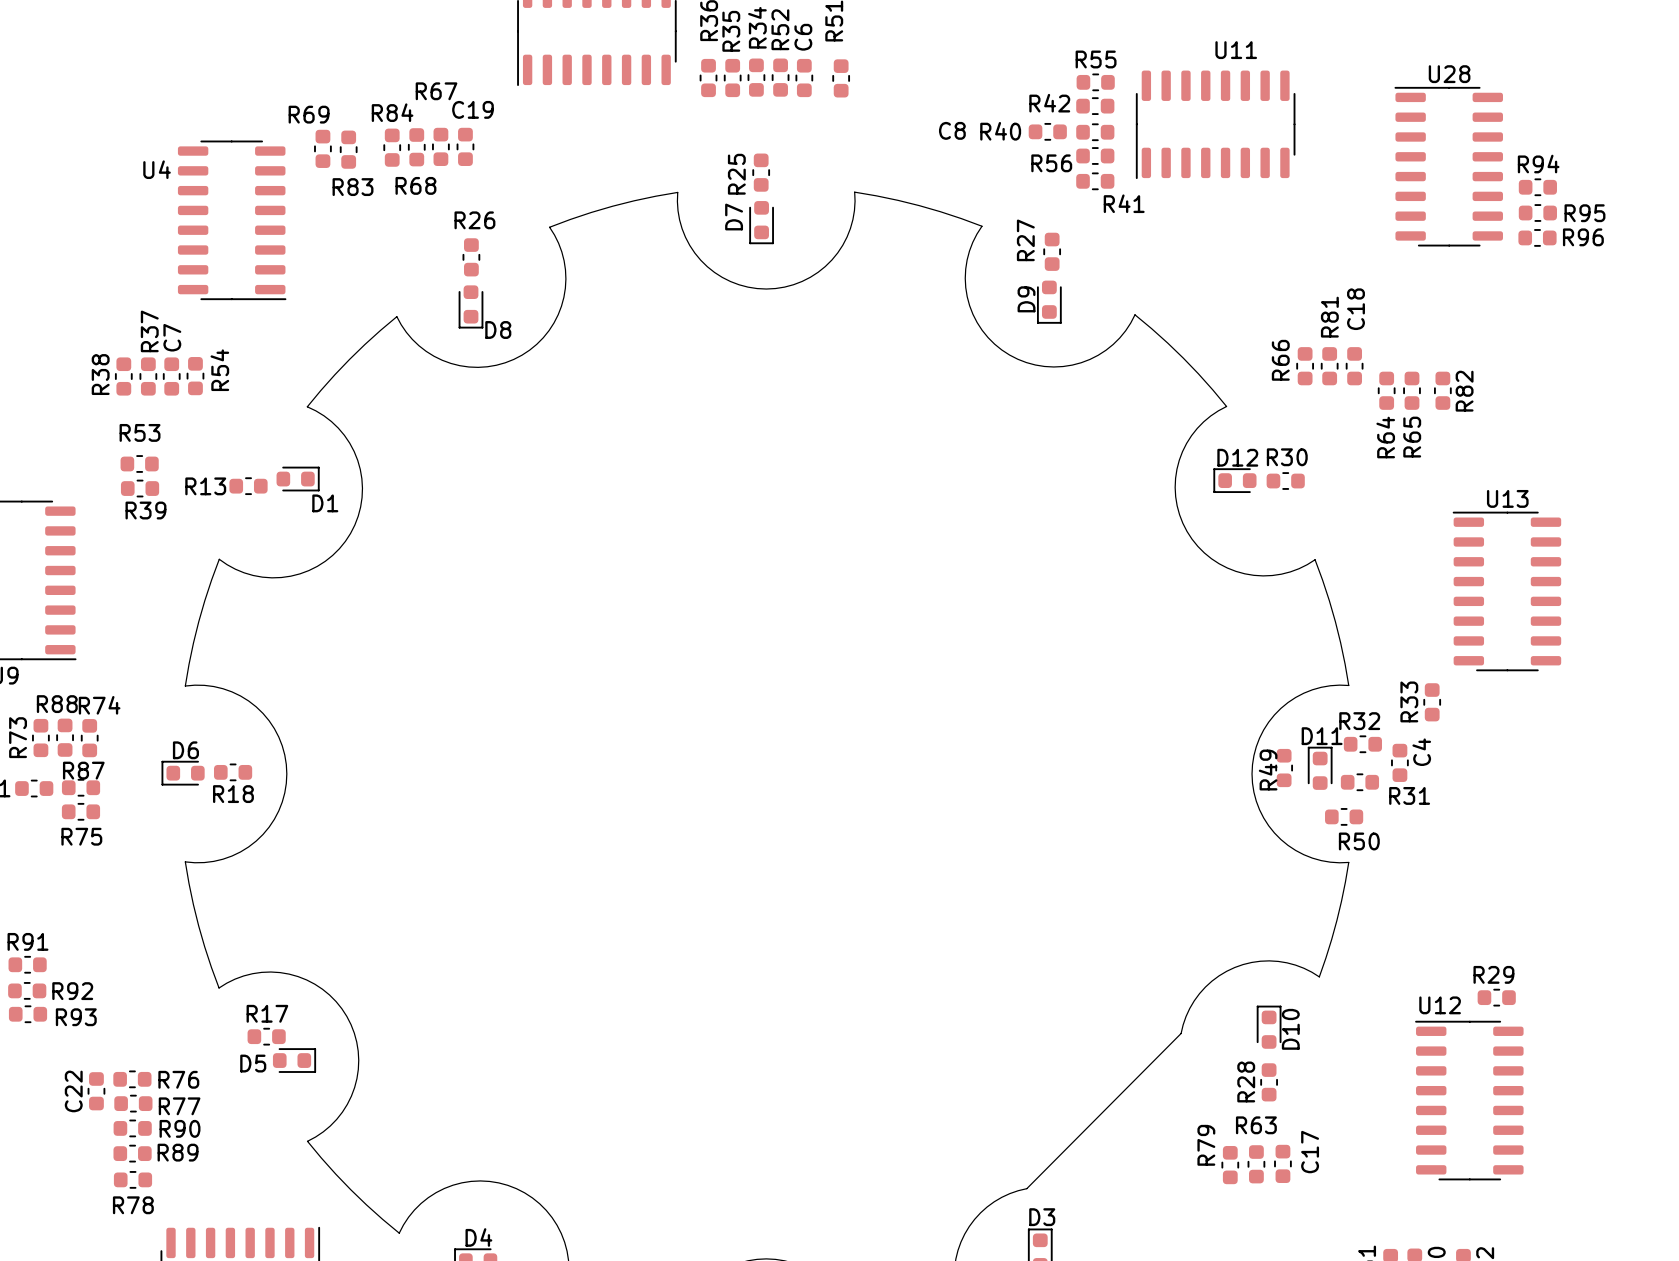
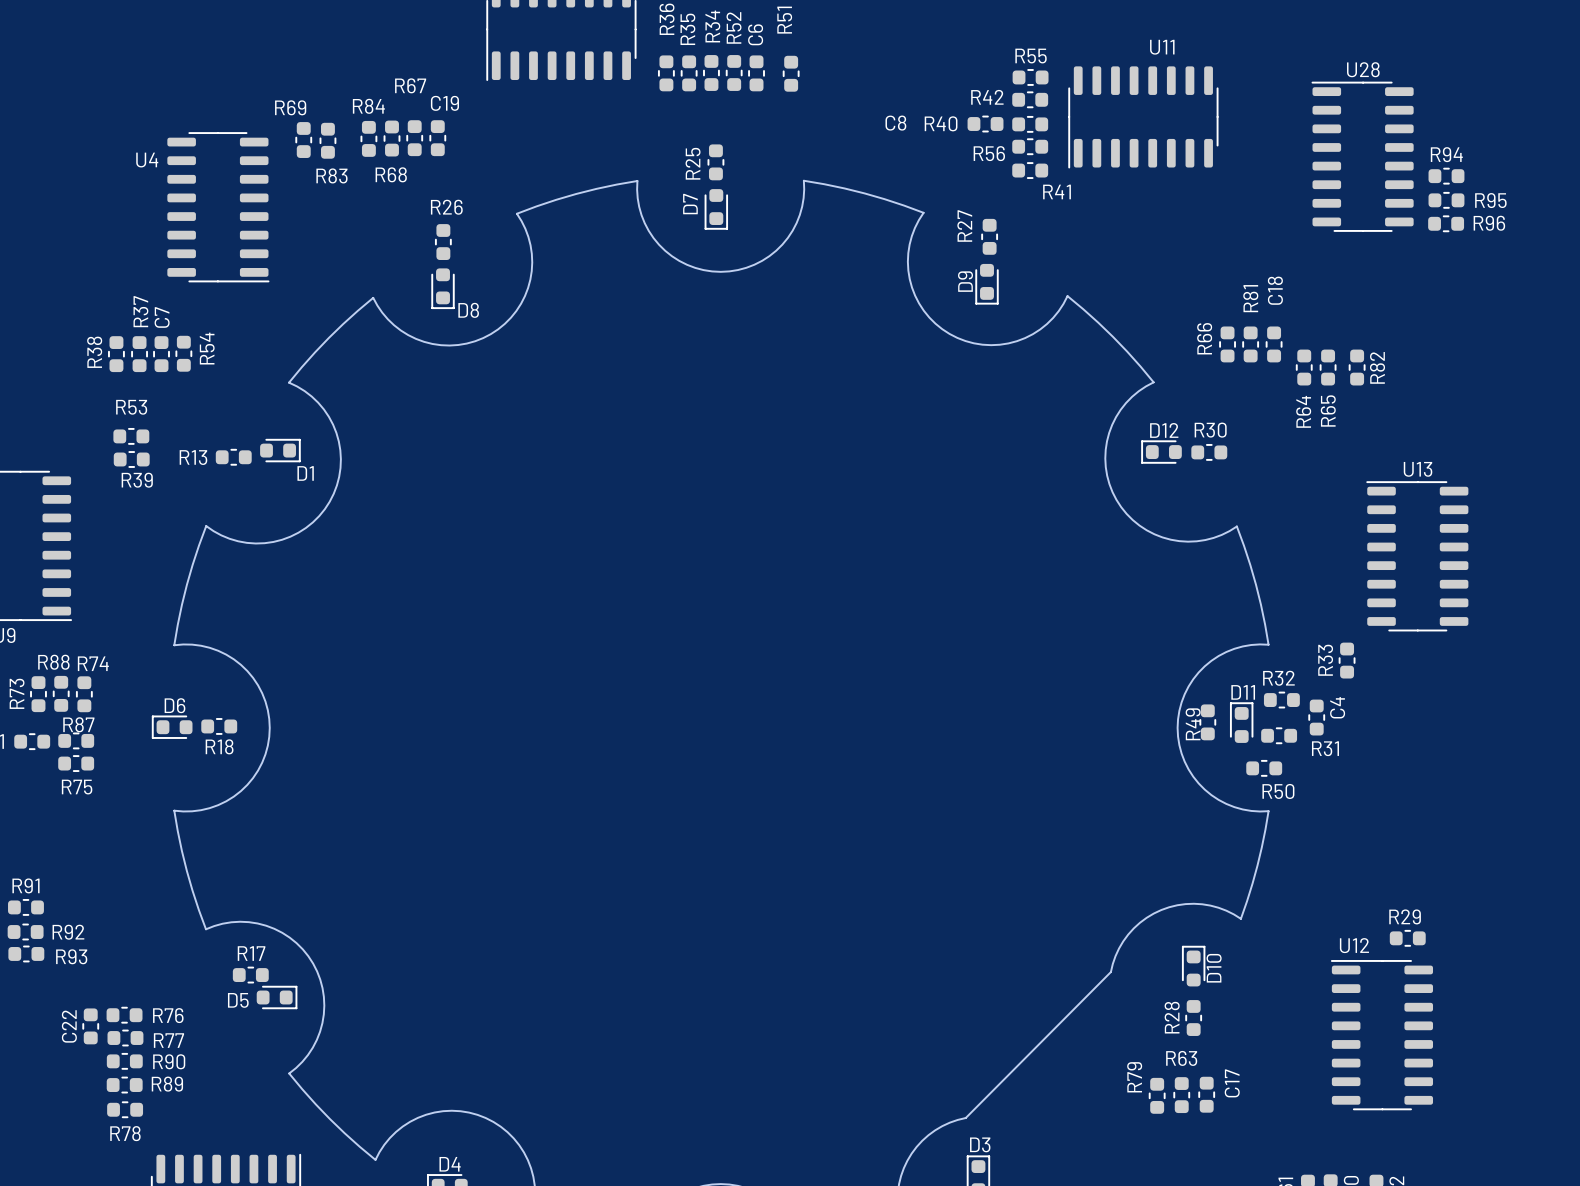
board edge: (854, 192) (854, 210) (850, 228) (837, 252) (825, 266) (810, 277) (793, 284) (775, 288) (757, 288) (730, 281) (714, 272) (700, 260) (689, 245) (682, 228) (678, 210) (677, 192) (612, 206) (549, 227) (558, 243) (564, 260) (565, 279) (563, 297) (558, 314) (549, 330) (529, 350) (513, 359) (496, 365) (478, 367) (459, 365) (442, 360) (418, 345) (406, 332) (396, 316) (349, 359) (307, 406) (323, 415) (338, 428) (354, 451) (360, 469) (362, 488) (360, 507) (350, 533) (339, 548) (325, 561) (308, 570) (281, 577) (262, 577) (244, 572) (219, 559) (198, 621) (185, 686) (204, 685) (223, 688) (240, 695) (256, 706) (274, 728) (282, 745) (286, 764) (286, 783) (278, 810) (269, 827) (256, 841) (240, 851) (223, 859) (204, 862) (185, 861) (198, 925) (219, 988) (235, 979) (252, 973) (270, 972) (289, 974) (306, 979) (329, 995) (341, 1008) (351, 1024) (356, 1042) (358, 1060) (356, 1078) (351, 1096) (342, 1112) (330, 1125) (307, 1141) -> (803, 180) (803, 198) (799, 214) (787, 237) (776, 250) (762, 260) (746, 267) (729, 271) (712, 271) (687, 264) (672, 256) (659, 244) (648, 230) (641, 215) (637, 198) (637, 180) (576, 193) (516, 213) (525, 228) (530, 245) (532, 262) (530, 279) (521, 303) (510, 317) (498, 329) (483, 338) (466, 343) (441, 345) (424, 341) (408, 335) (394, 325) (382, 312) (373, 297) (328, 337) (289, 382) (304, 391) (318, 402) (333, 424) (338, 441) (340, 459) (339, 476) (329, 501) (319, 516) (298, 532) (282, 539) (264, 543) (246, 542) (229, 538) (206, 526) (186, 584) (174, 645) (192, 644) (209, 647) (226, 654) (240, 664) (258, 685) (265, 701) (269, 719) (269, 736) (265, 754) (258, 770) (240, 791) (226, 801) (209, 808) (192, 811) (174, 810) (186, 870) (206, 929) (222, 923) (240, 921) (257, 923) (274, 928) (289, 937) (302, 949) (317, 971) (323, 996) (322, 1023) (312, 1047) (302, 1061) (289, 1073)

